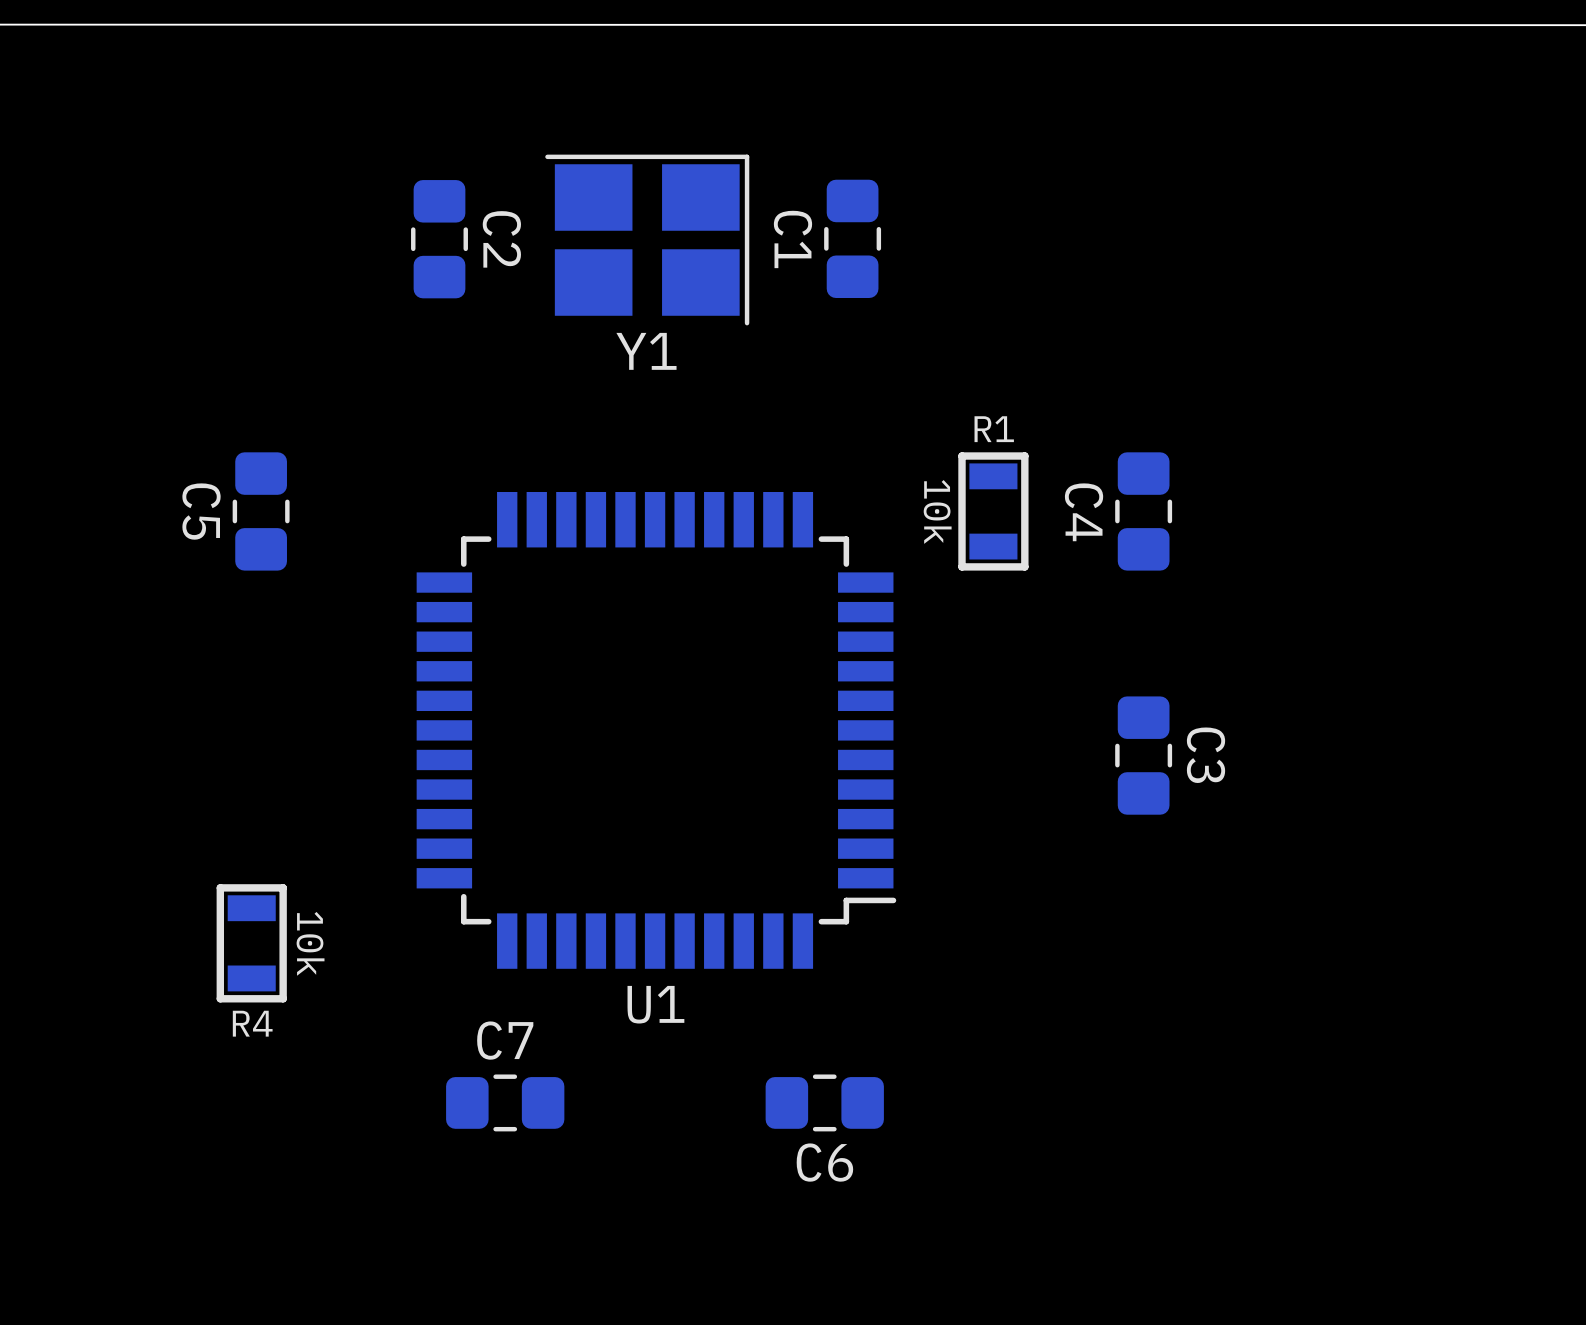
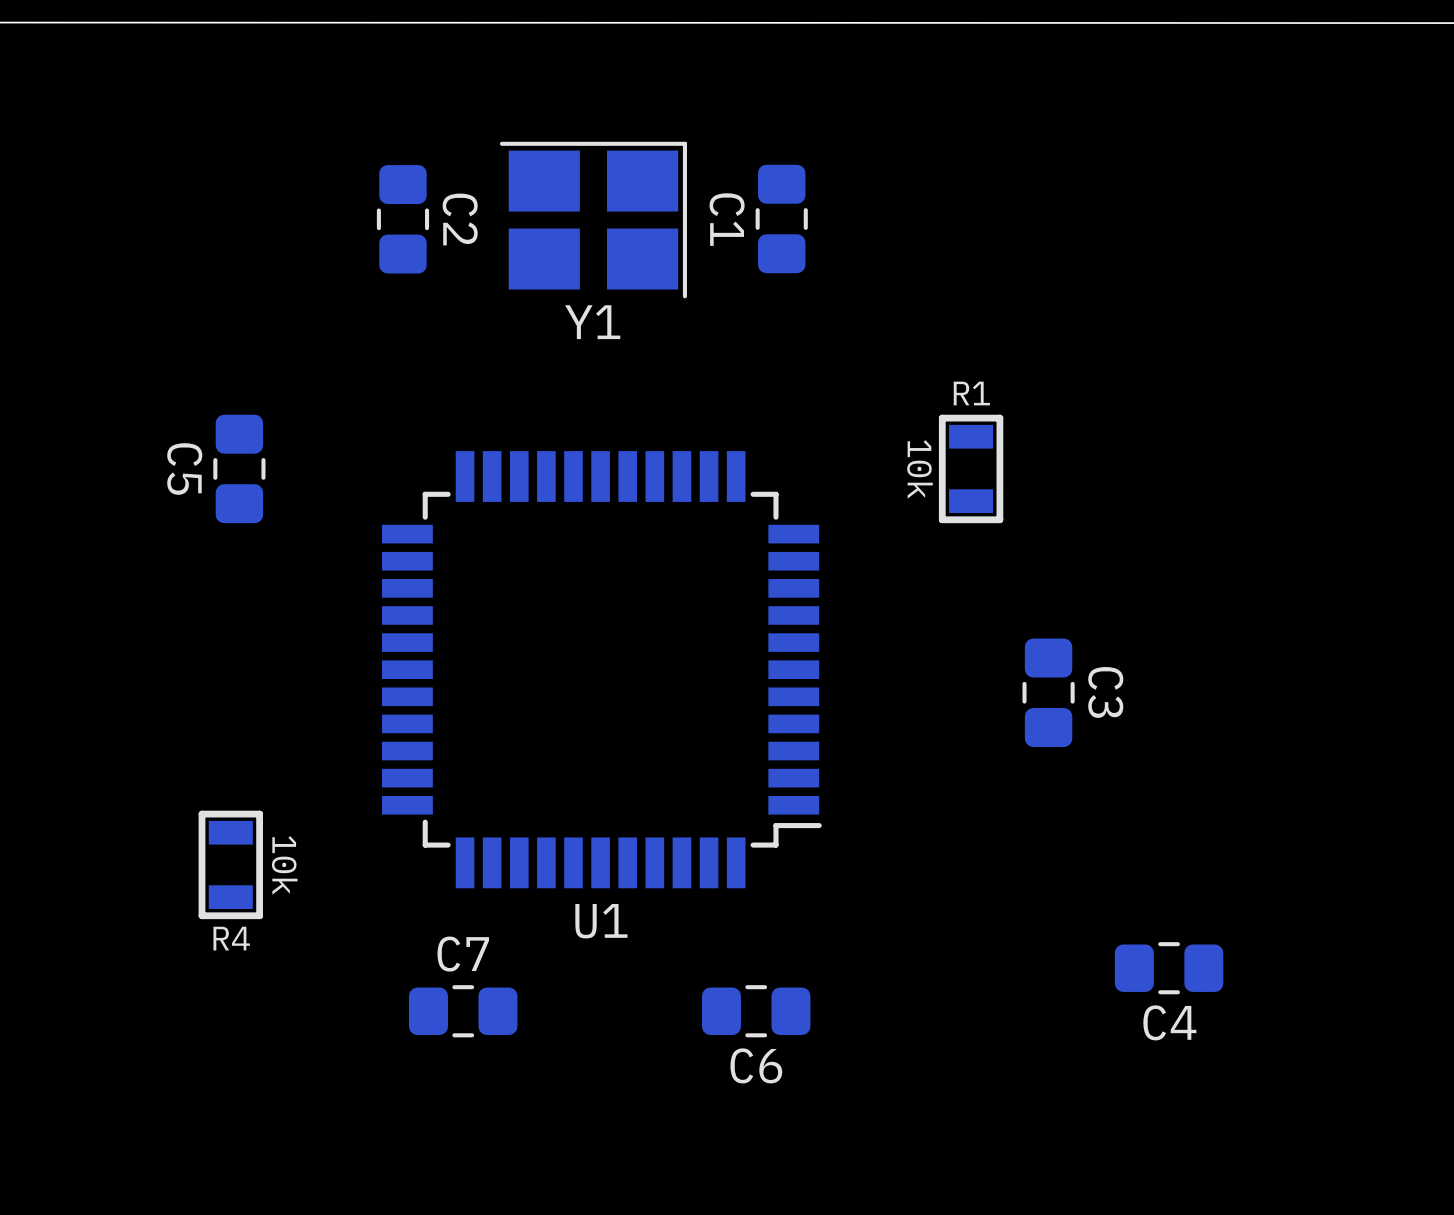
R1 position: (993, 511) -> (971, 468)
C4 rotation: 0° (1143, 511) -> 90° clockwise (1169, 968)
C4 position: (1143, 511) -> (1169, 968)
C4 name position: C4 (1084, 512) -> C4 (1169, 1022)

